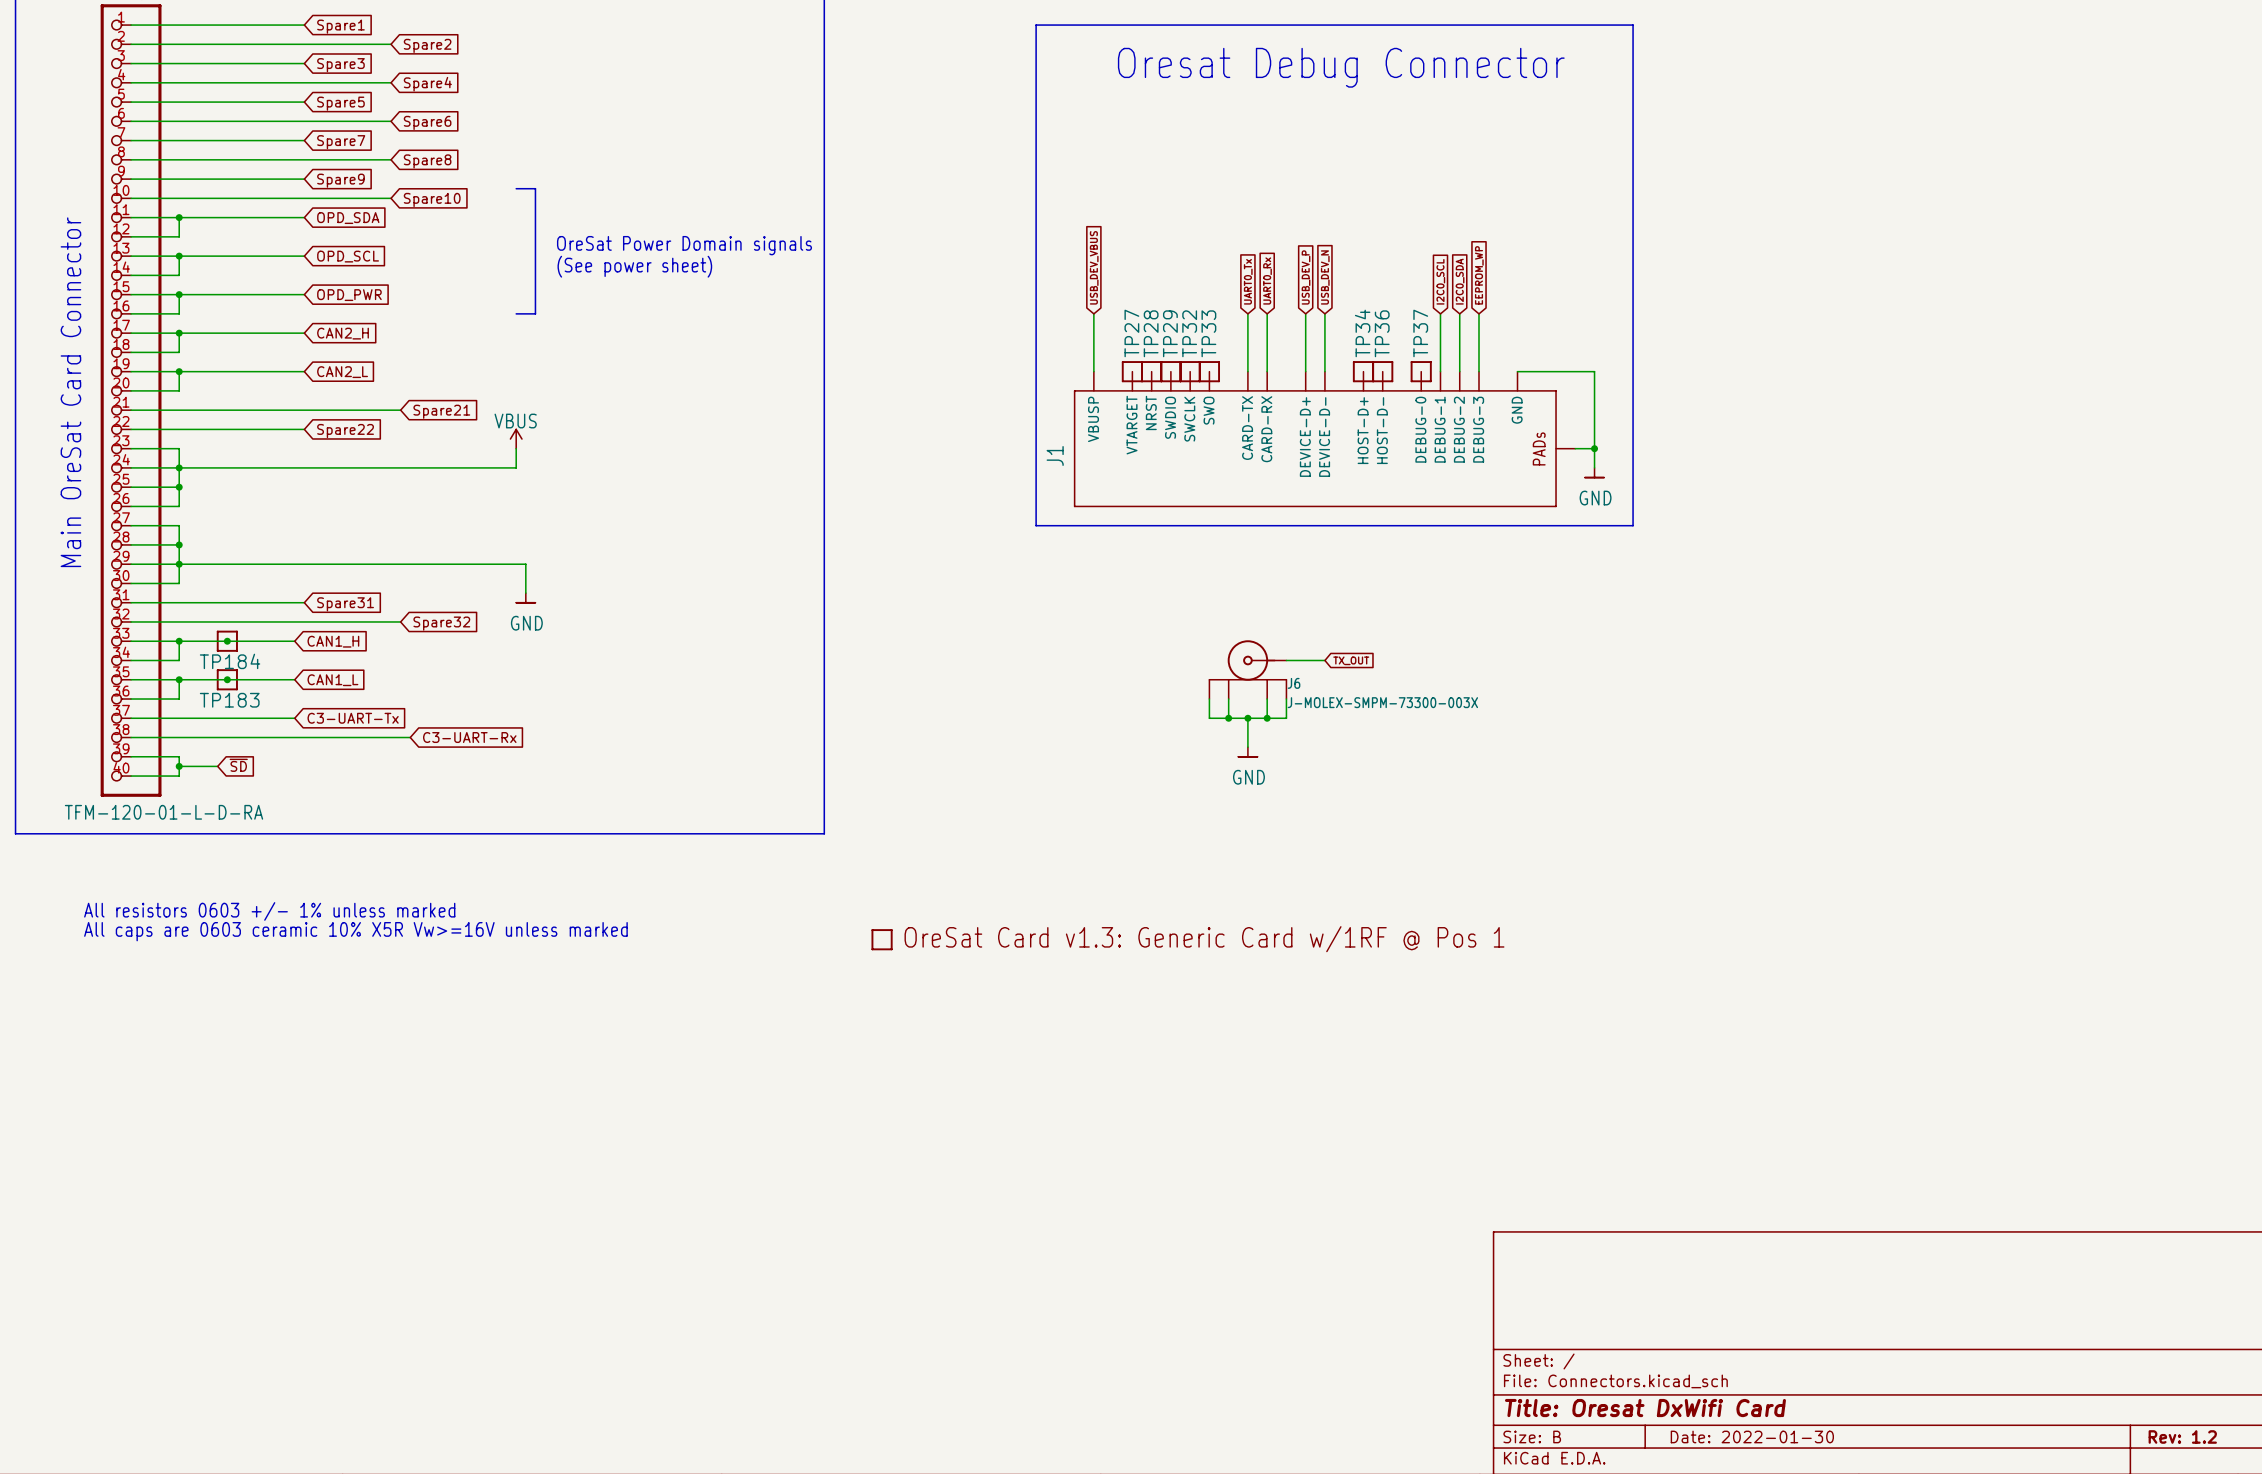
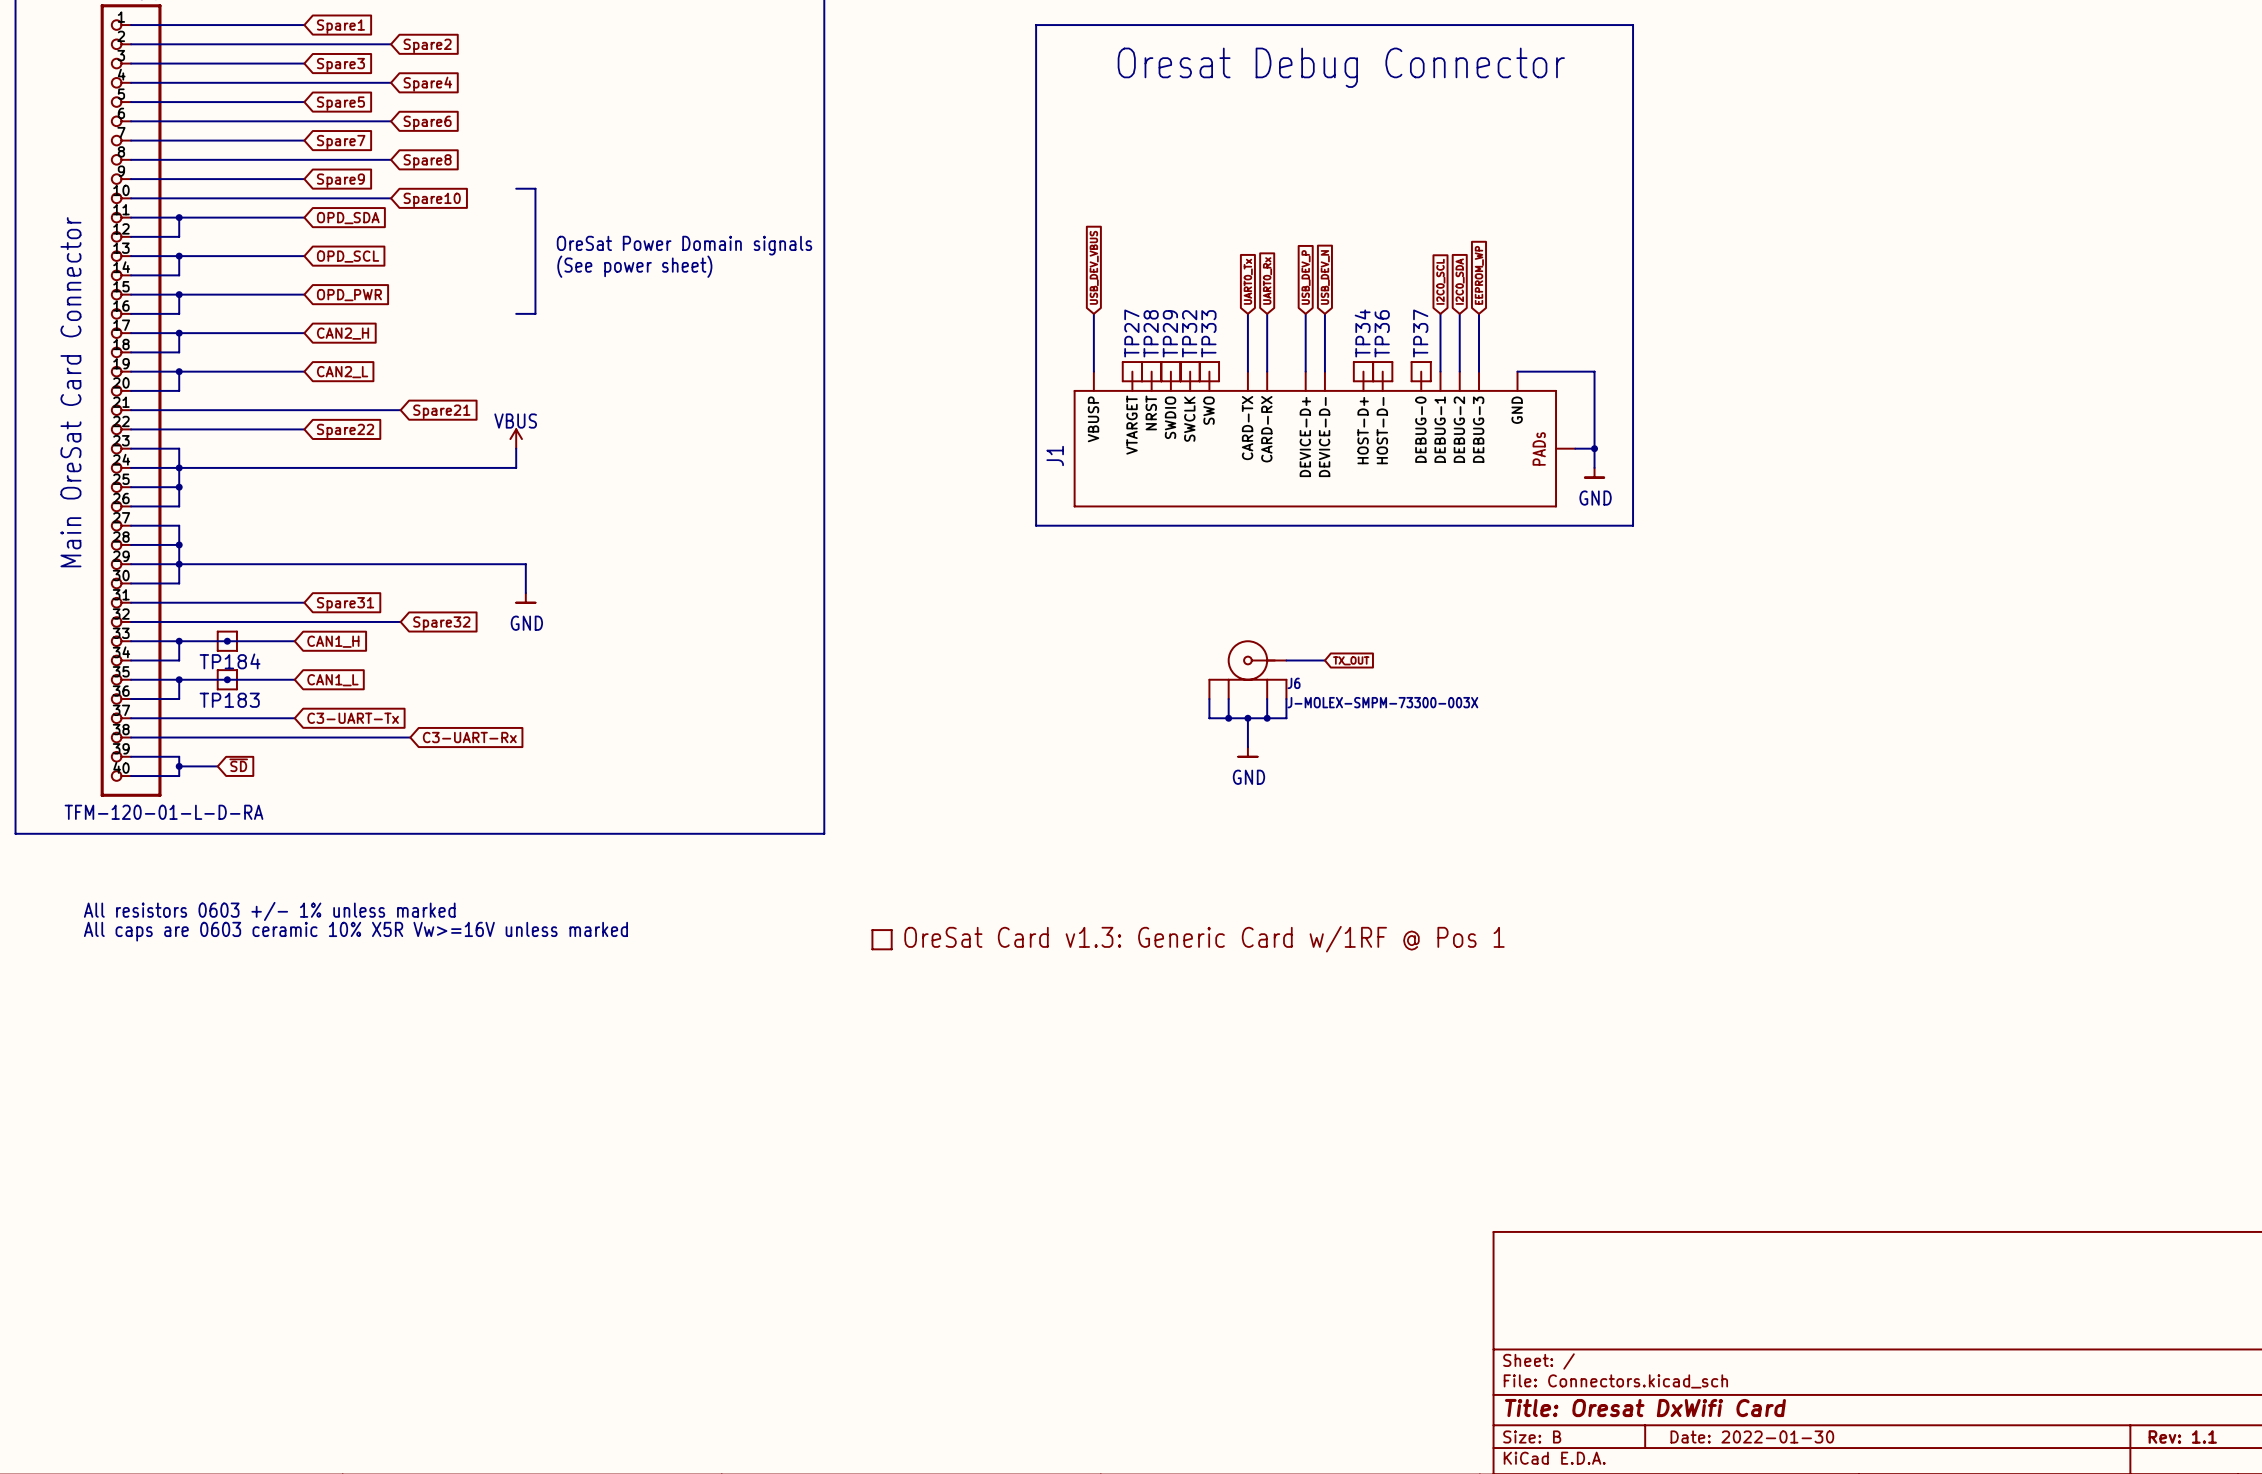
title block: Rev: 1.2 (2182, 1436) -> Rev: 1.1 (2182, 1436)

